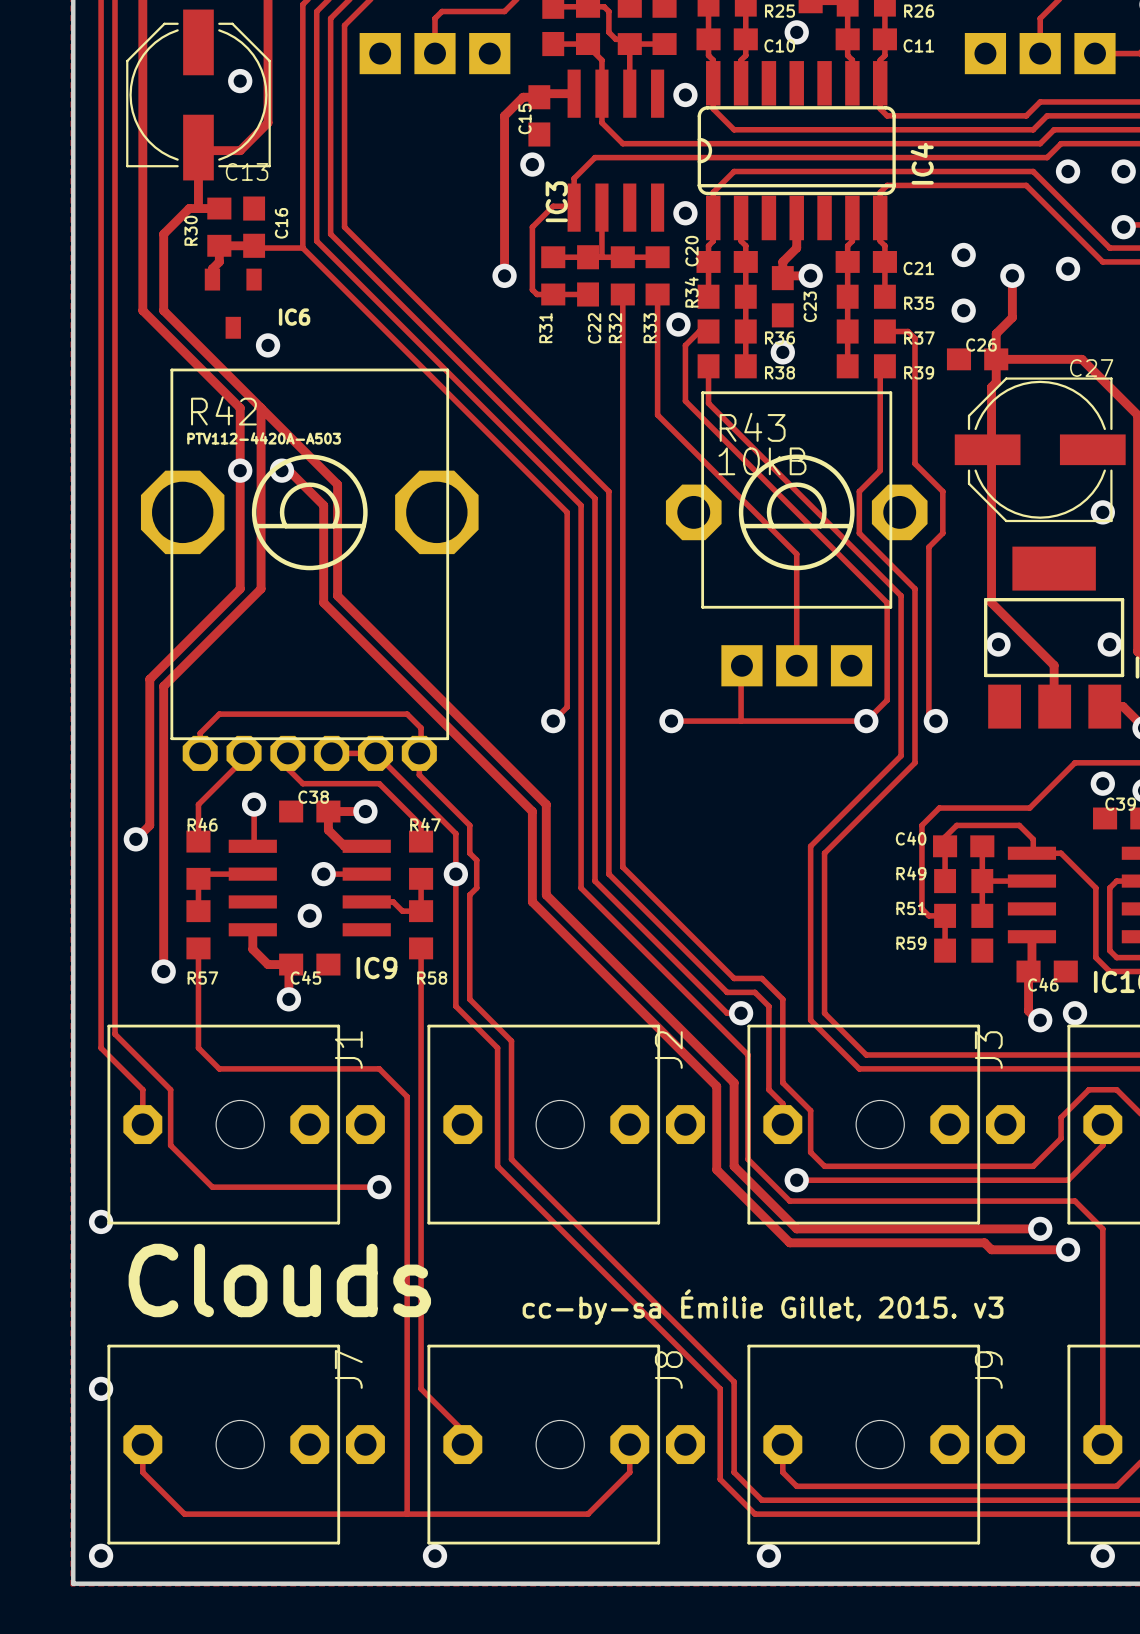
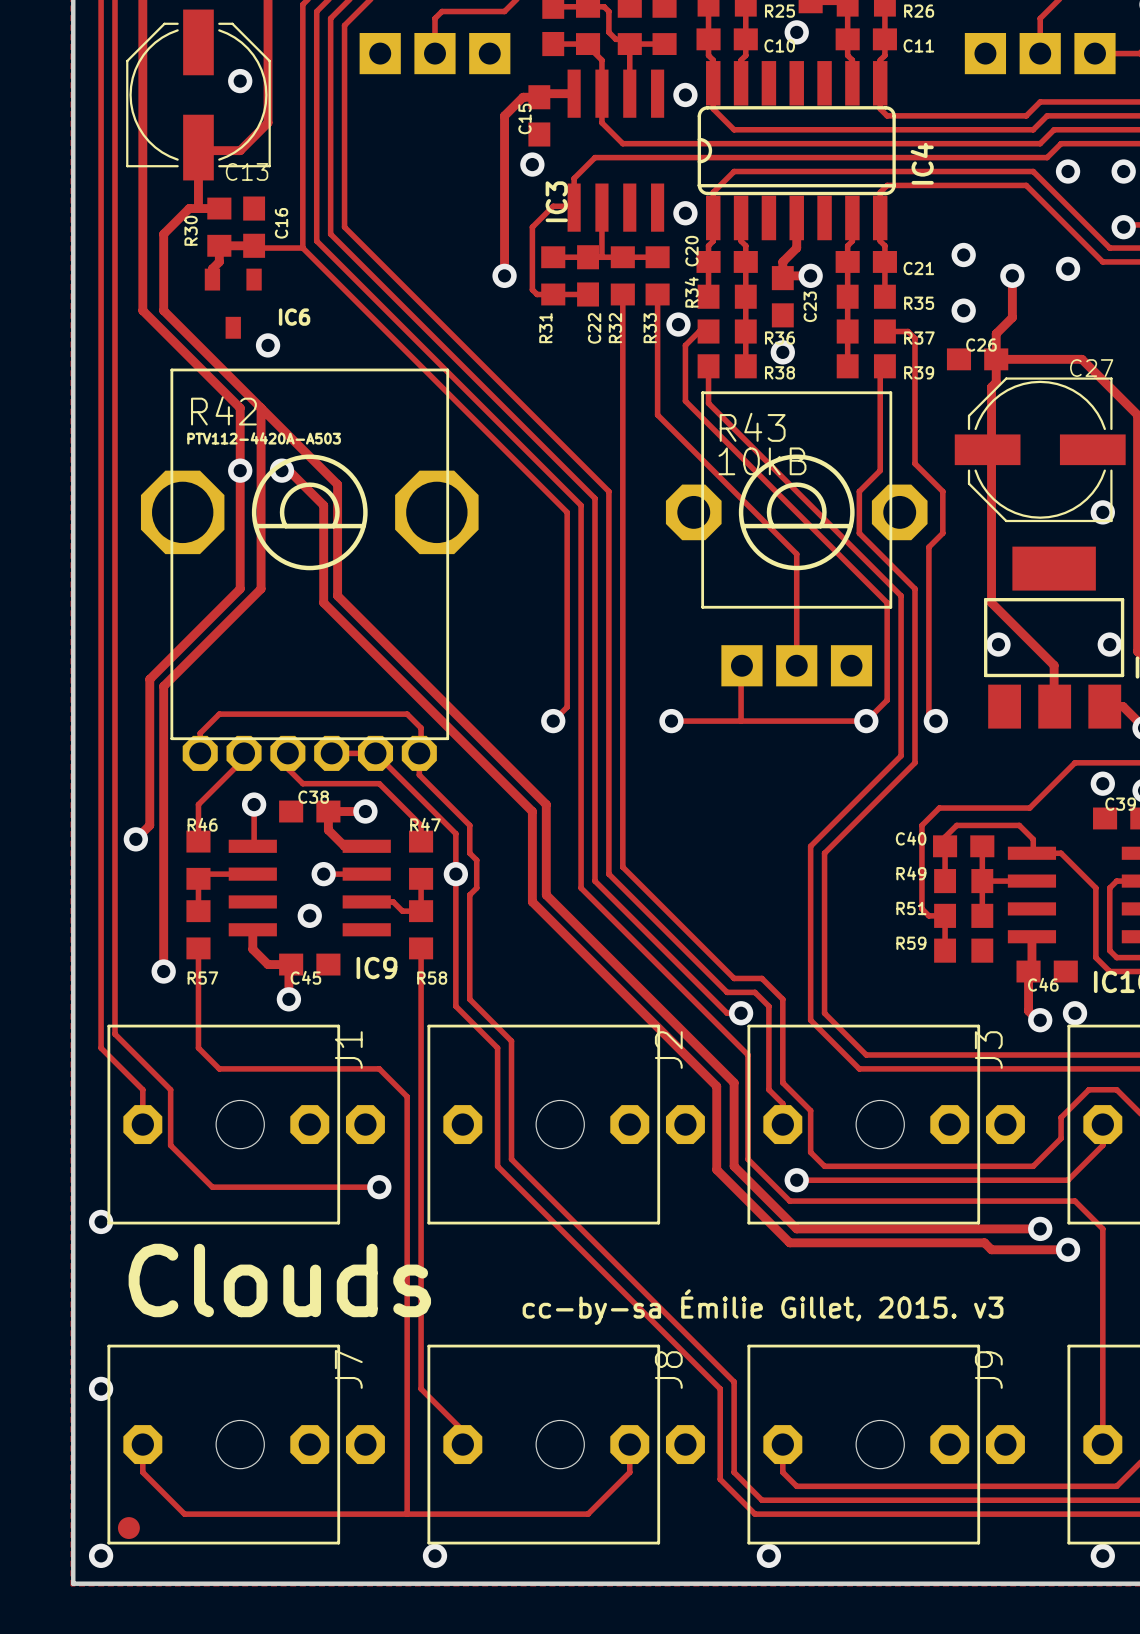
part: none -> (128, 1528)

